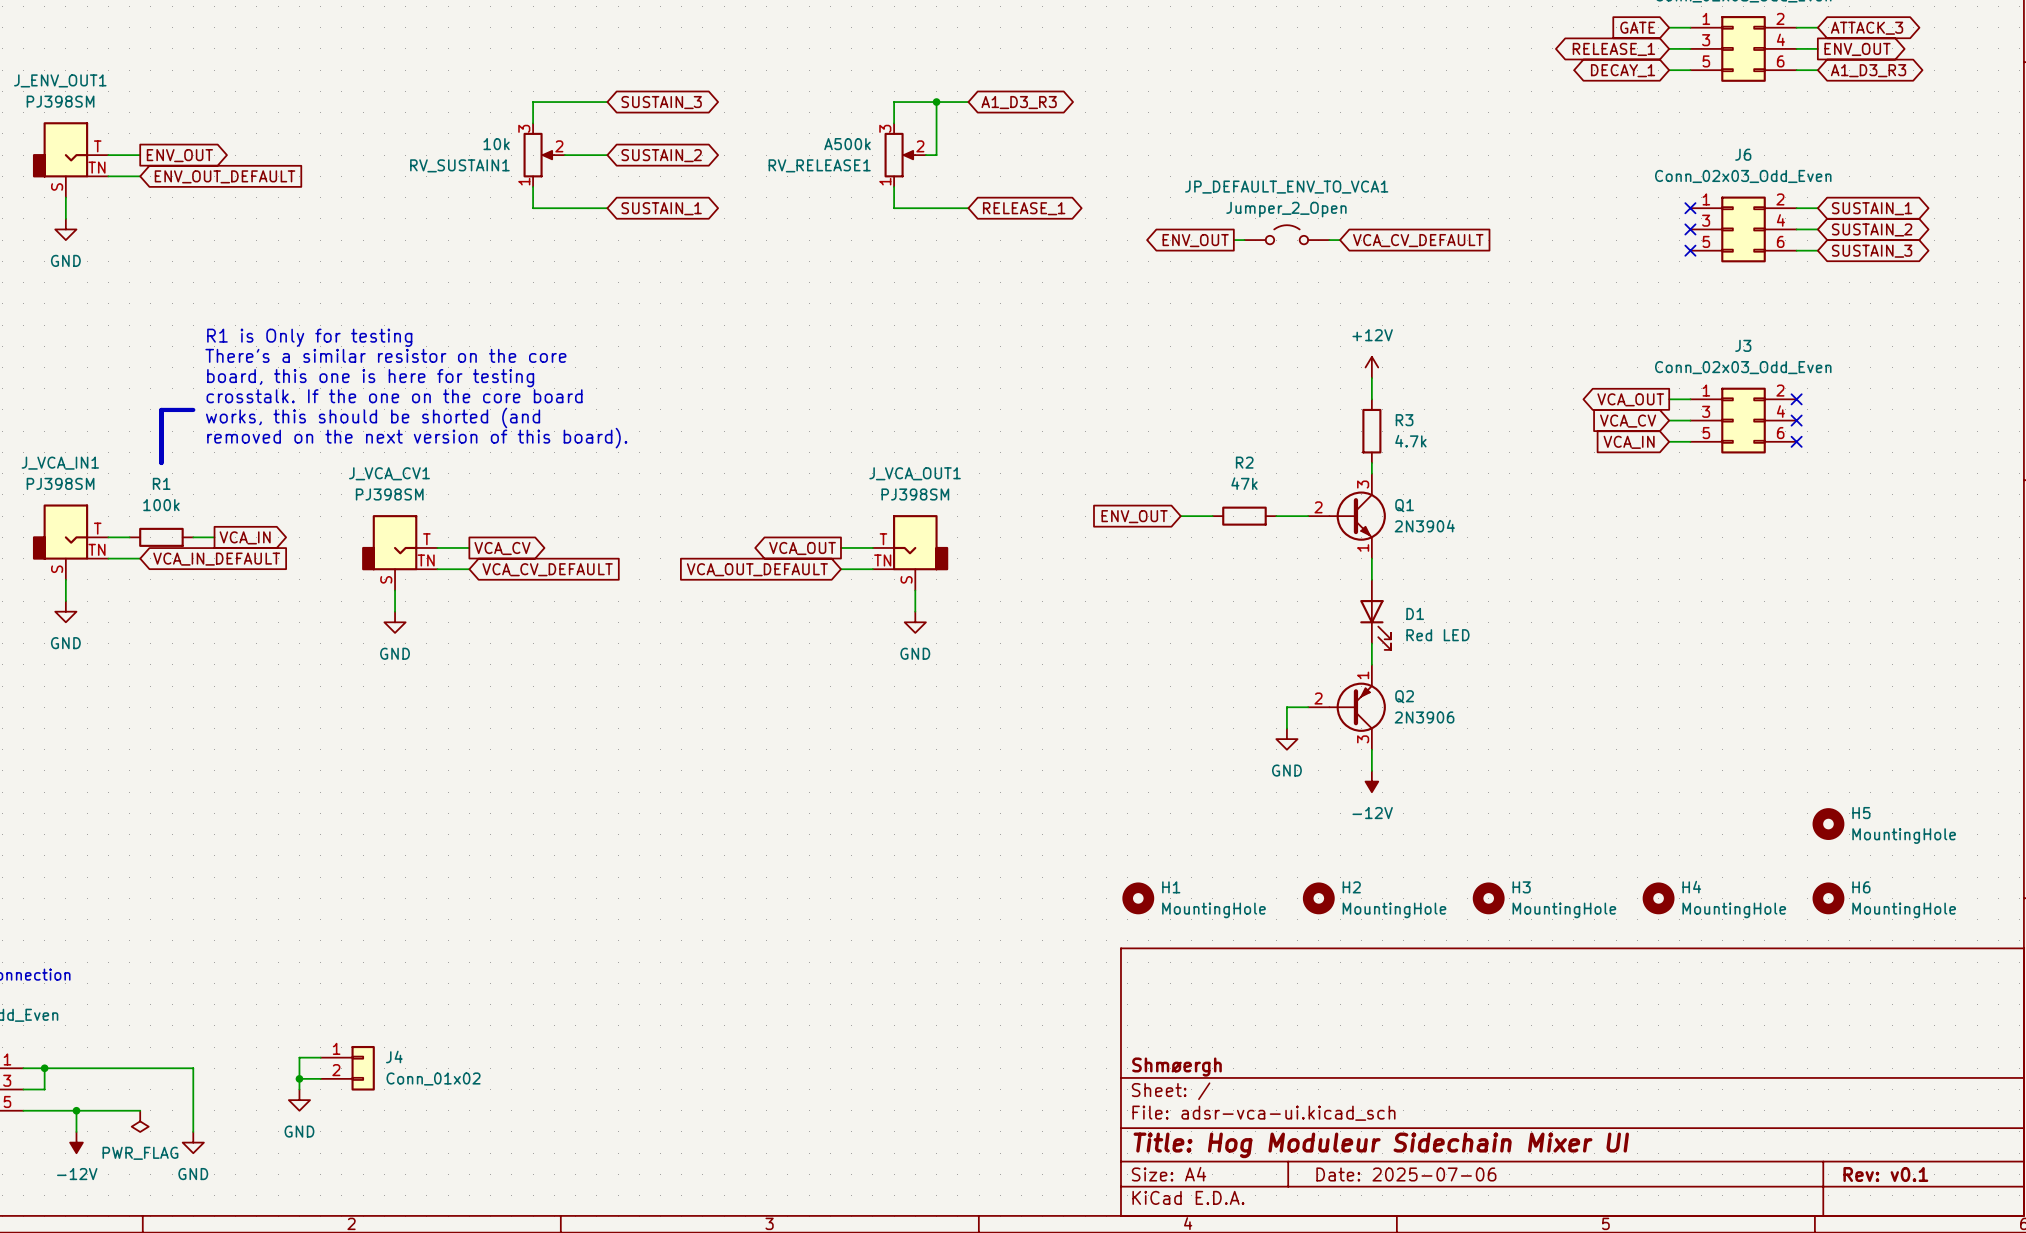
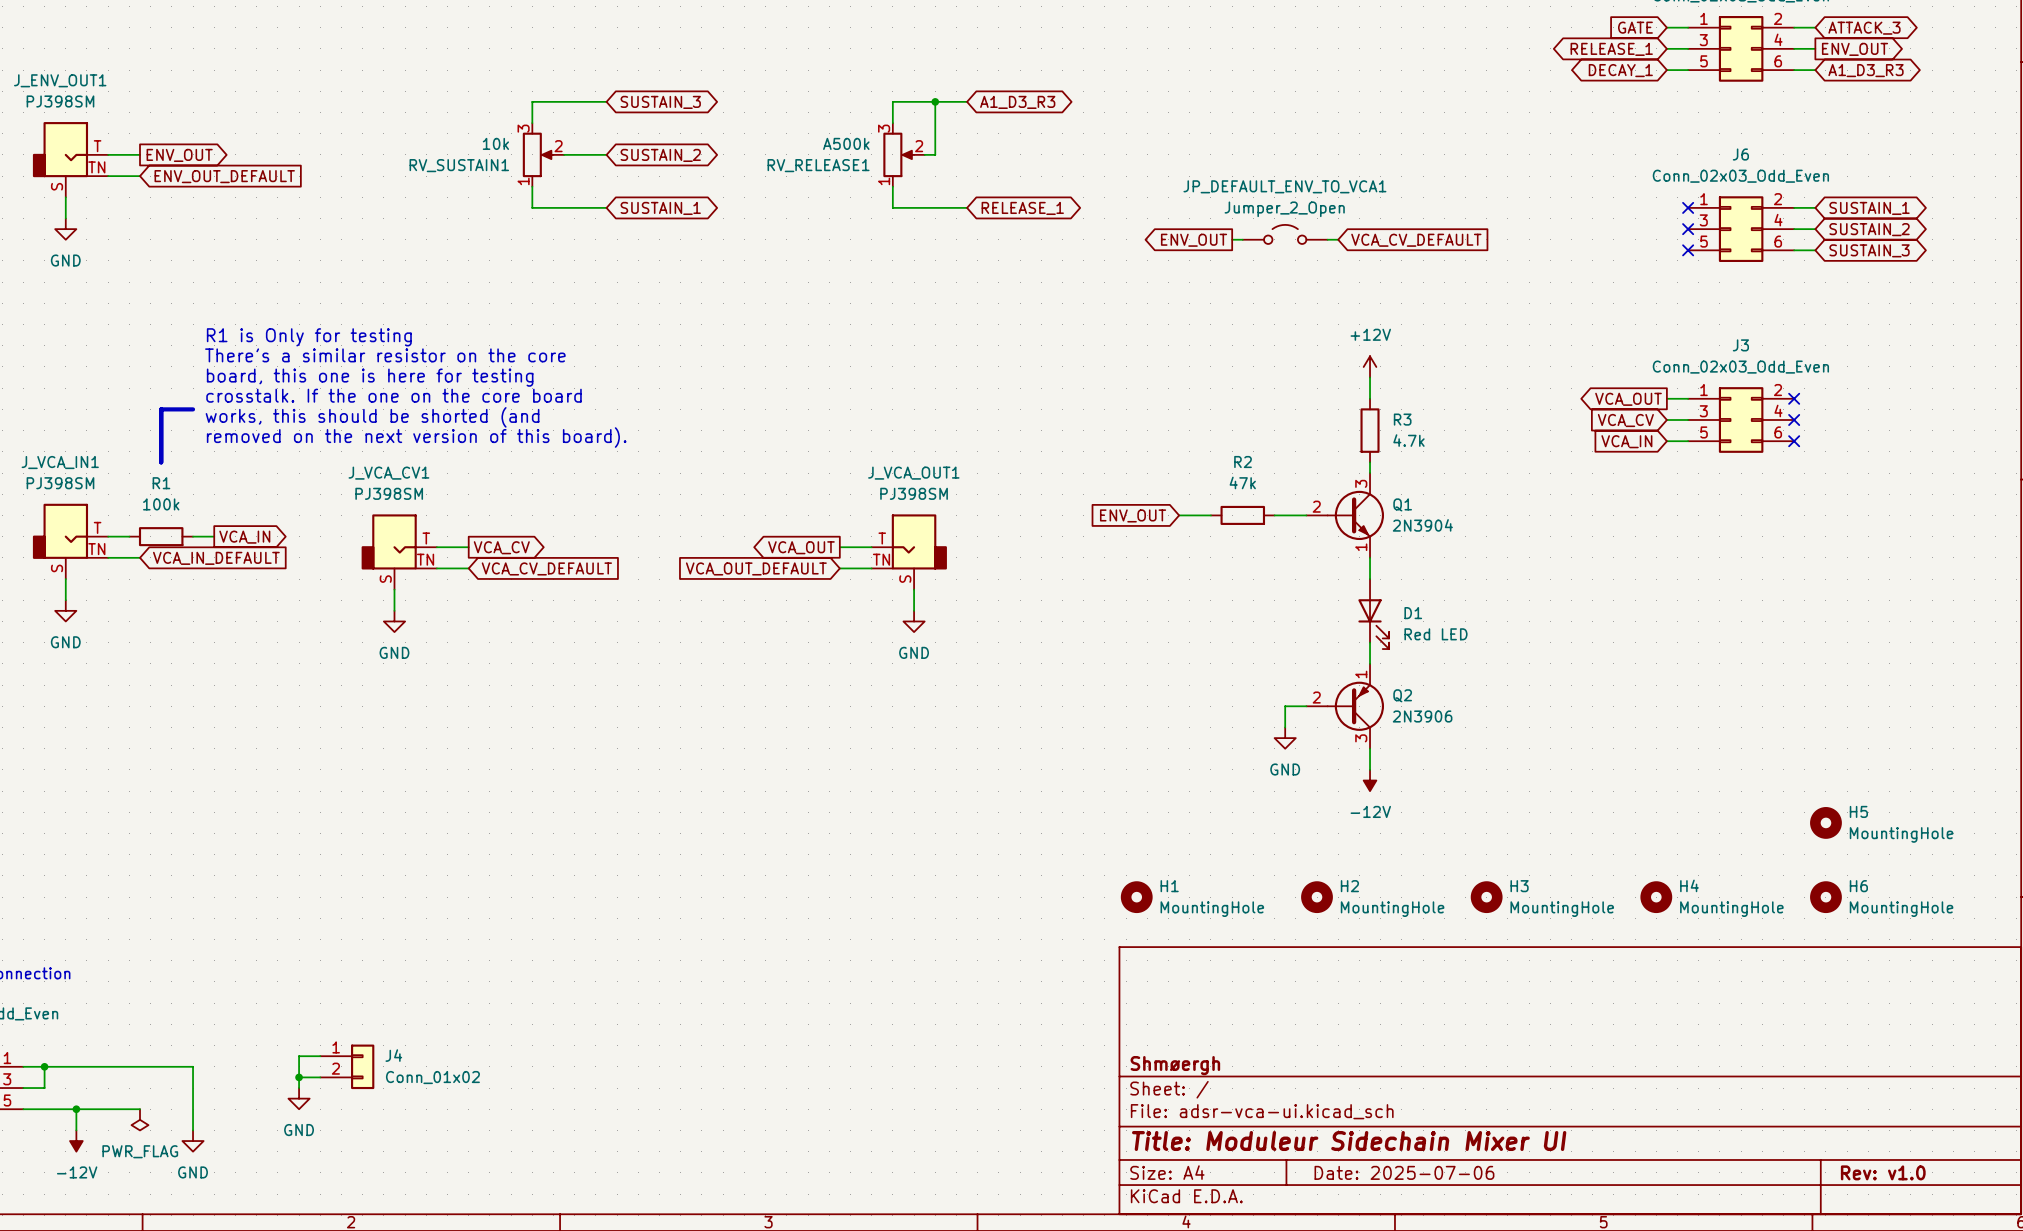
title block: Title: Hog Moduleur Sidechain Mixer UI (1381, 1145) -> Title: Moduleur Sidechain Mixer UI (1349, 1140)
title block: Rev: v0.1 (1885, 1174) -> Rev: v1.0 (1883, 1172)

